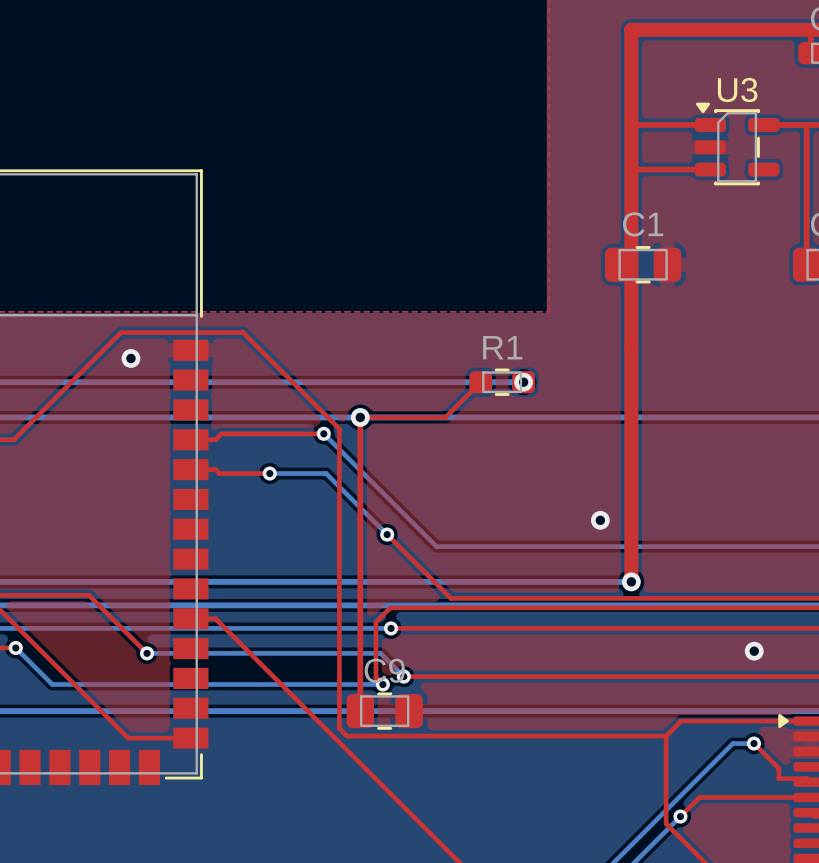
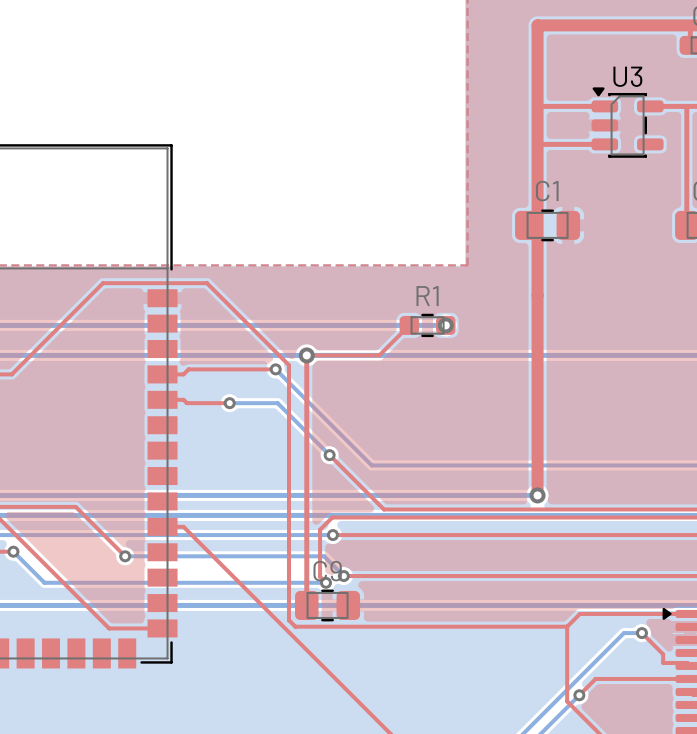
via: (130, 358) -> none
via: (600, 520) -> none
via: (754, 651) -> none

